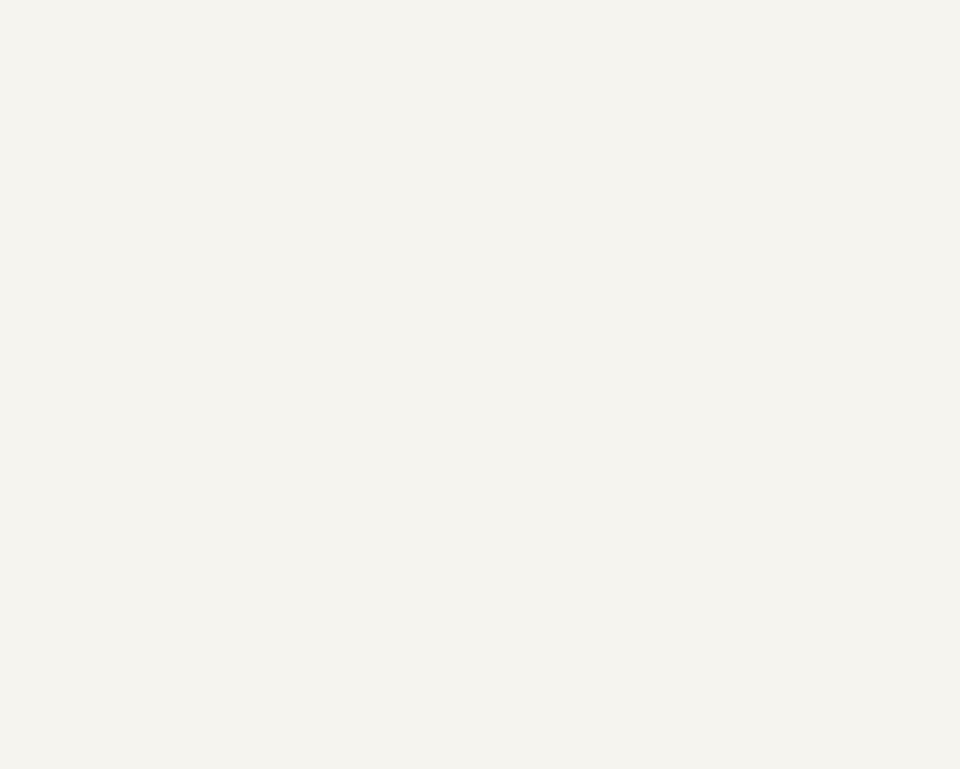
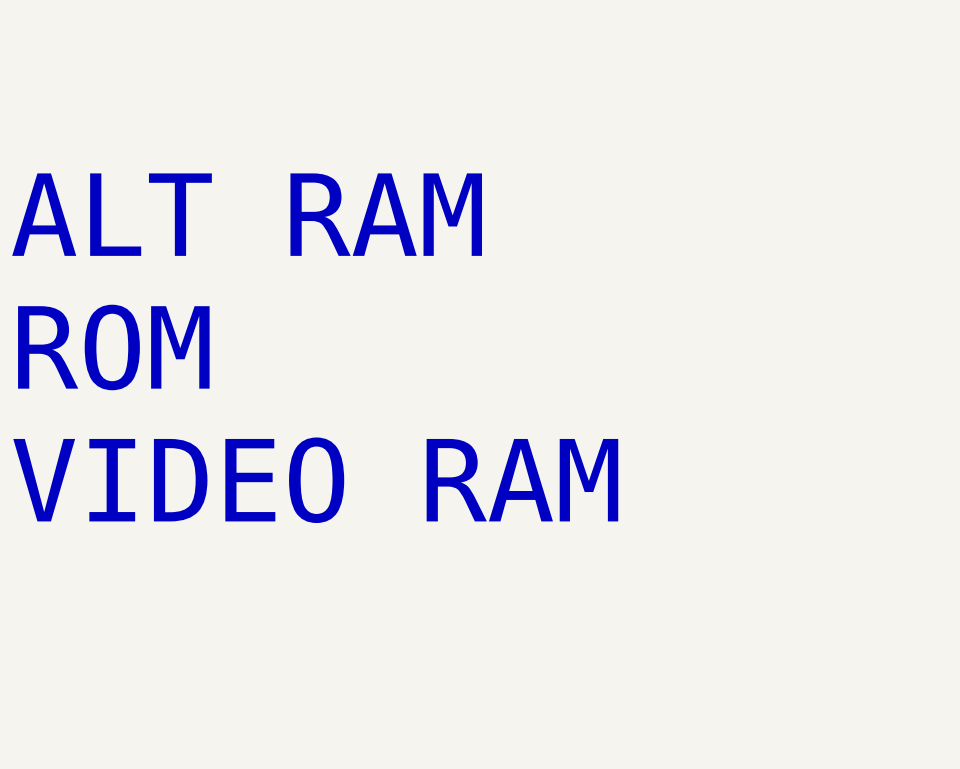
text: none -> ALT RAM (247, 214)
text: none -> ROM (113, 347)
text: none -> VIDEO RAM (315, 480)

